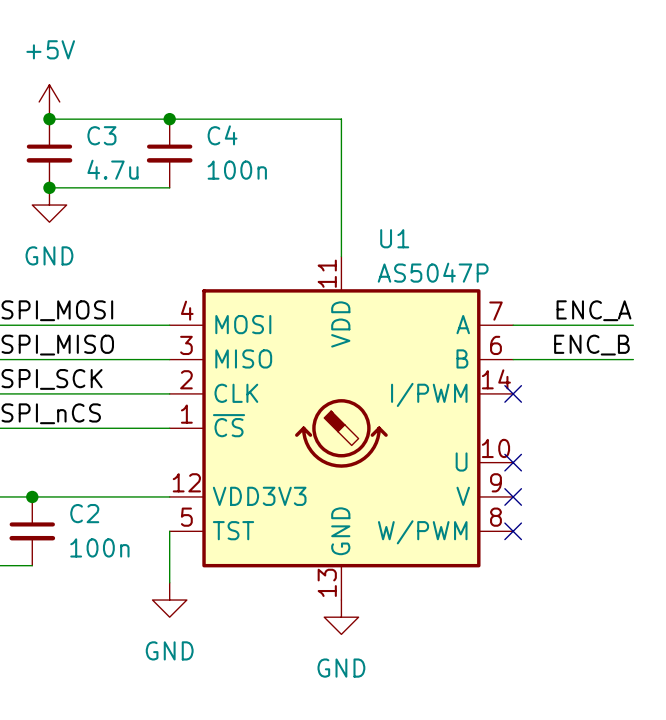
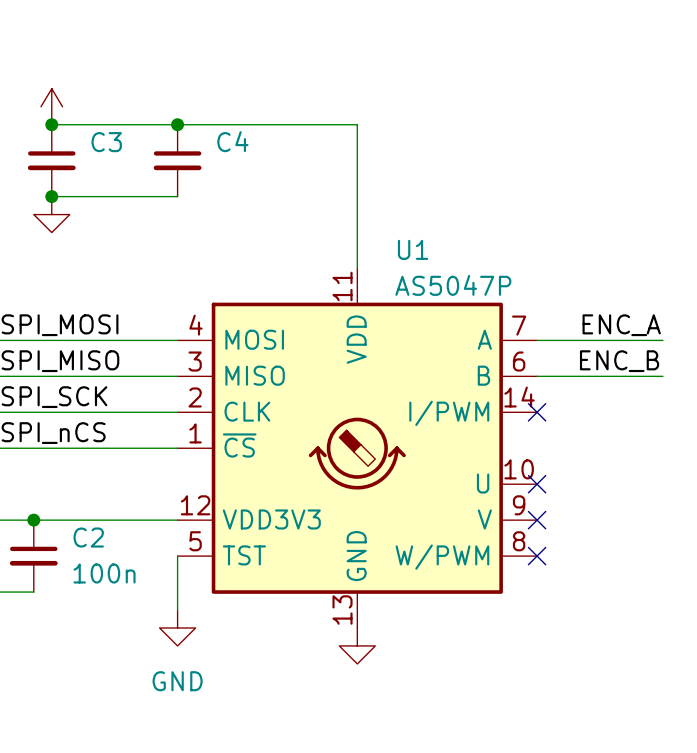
power symbol text: +5V (50, 49) -> none
C3 value: 4.7u (112, 169) -> none
C4 value: 100n (237, 170) -> none
power symbol text: GND (49, 255) -> none
power symbol text: GND (341, 668) -> none

